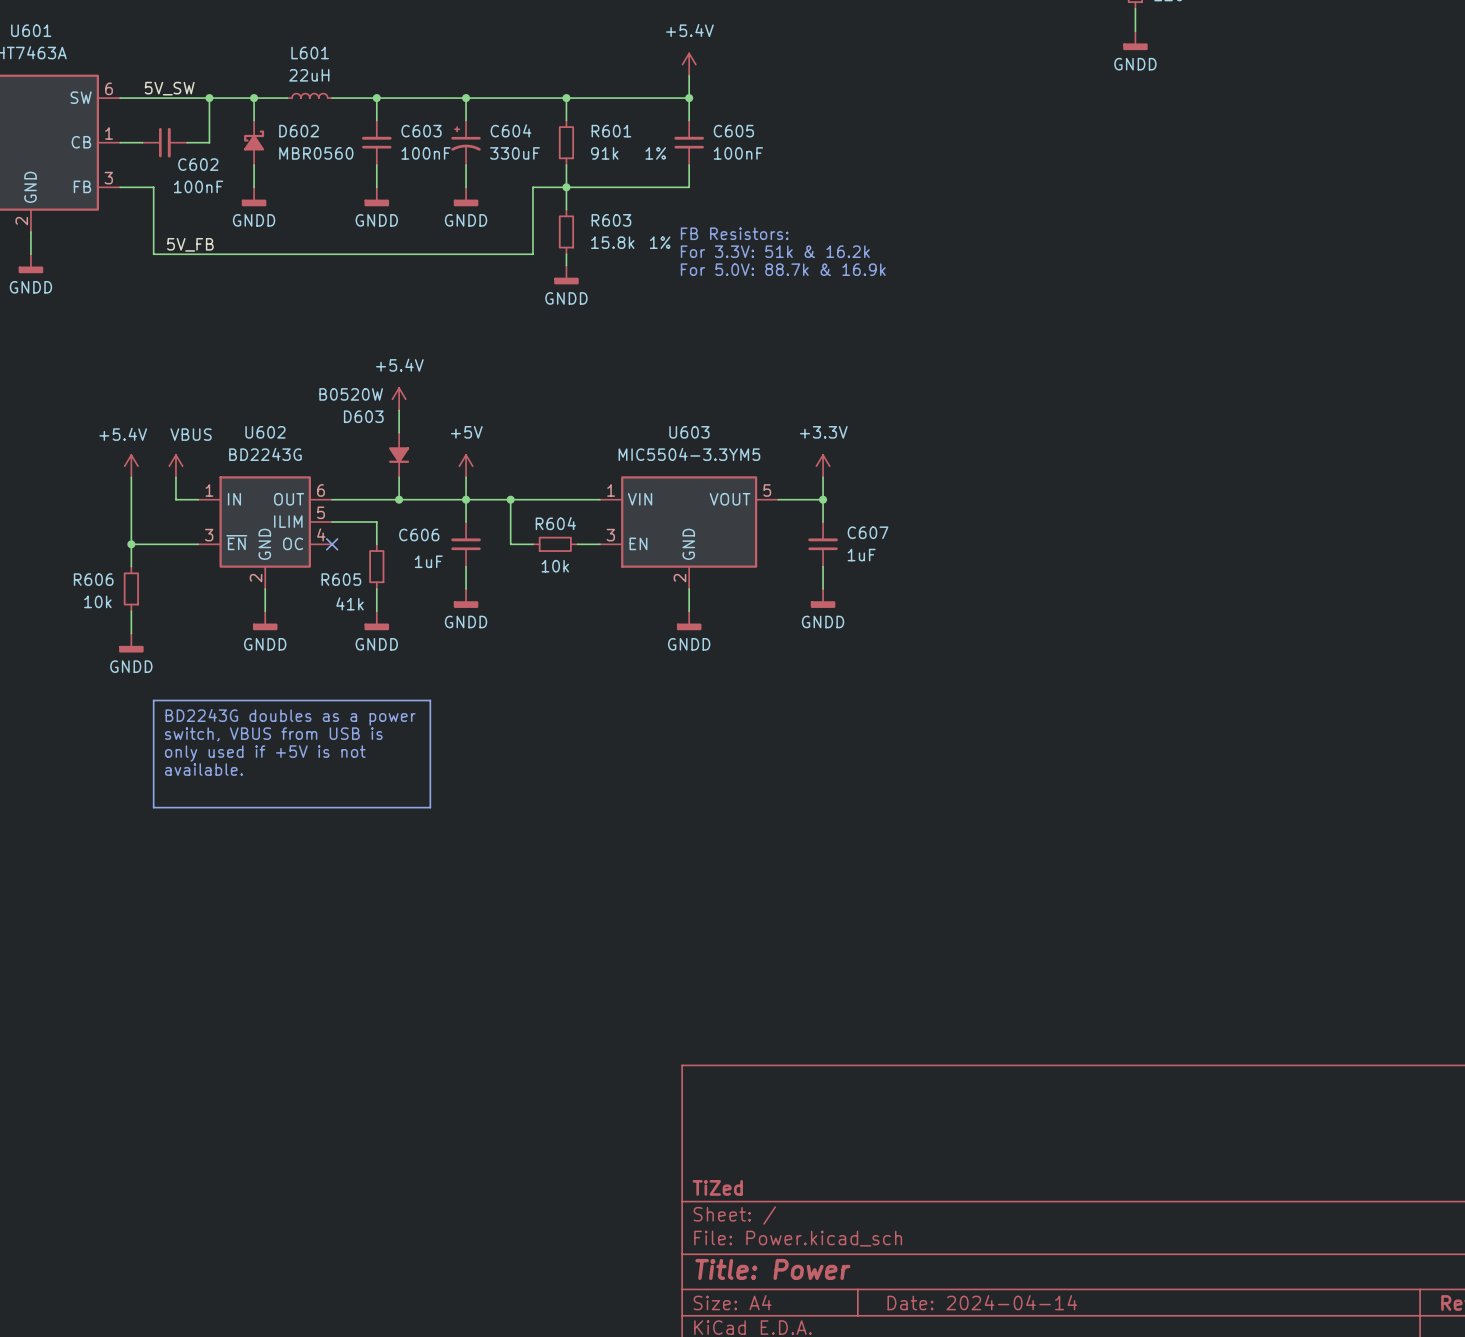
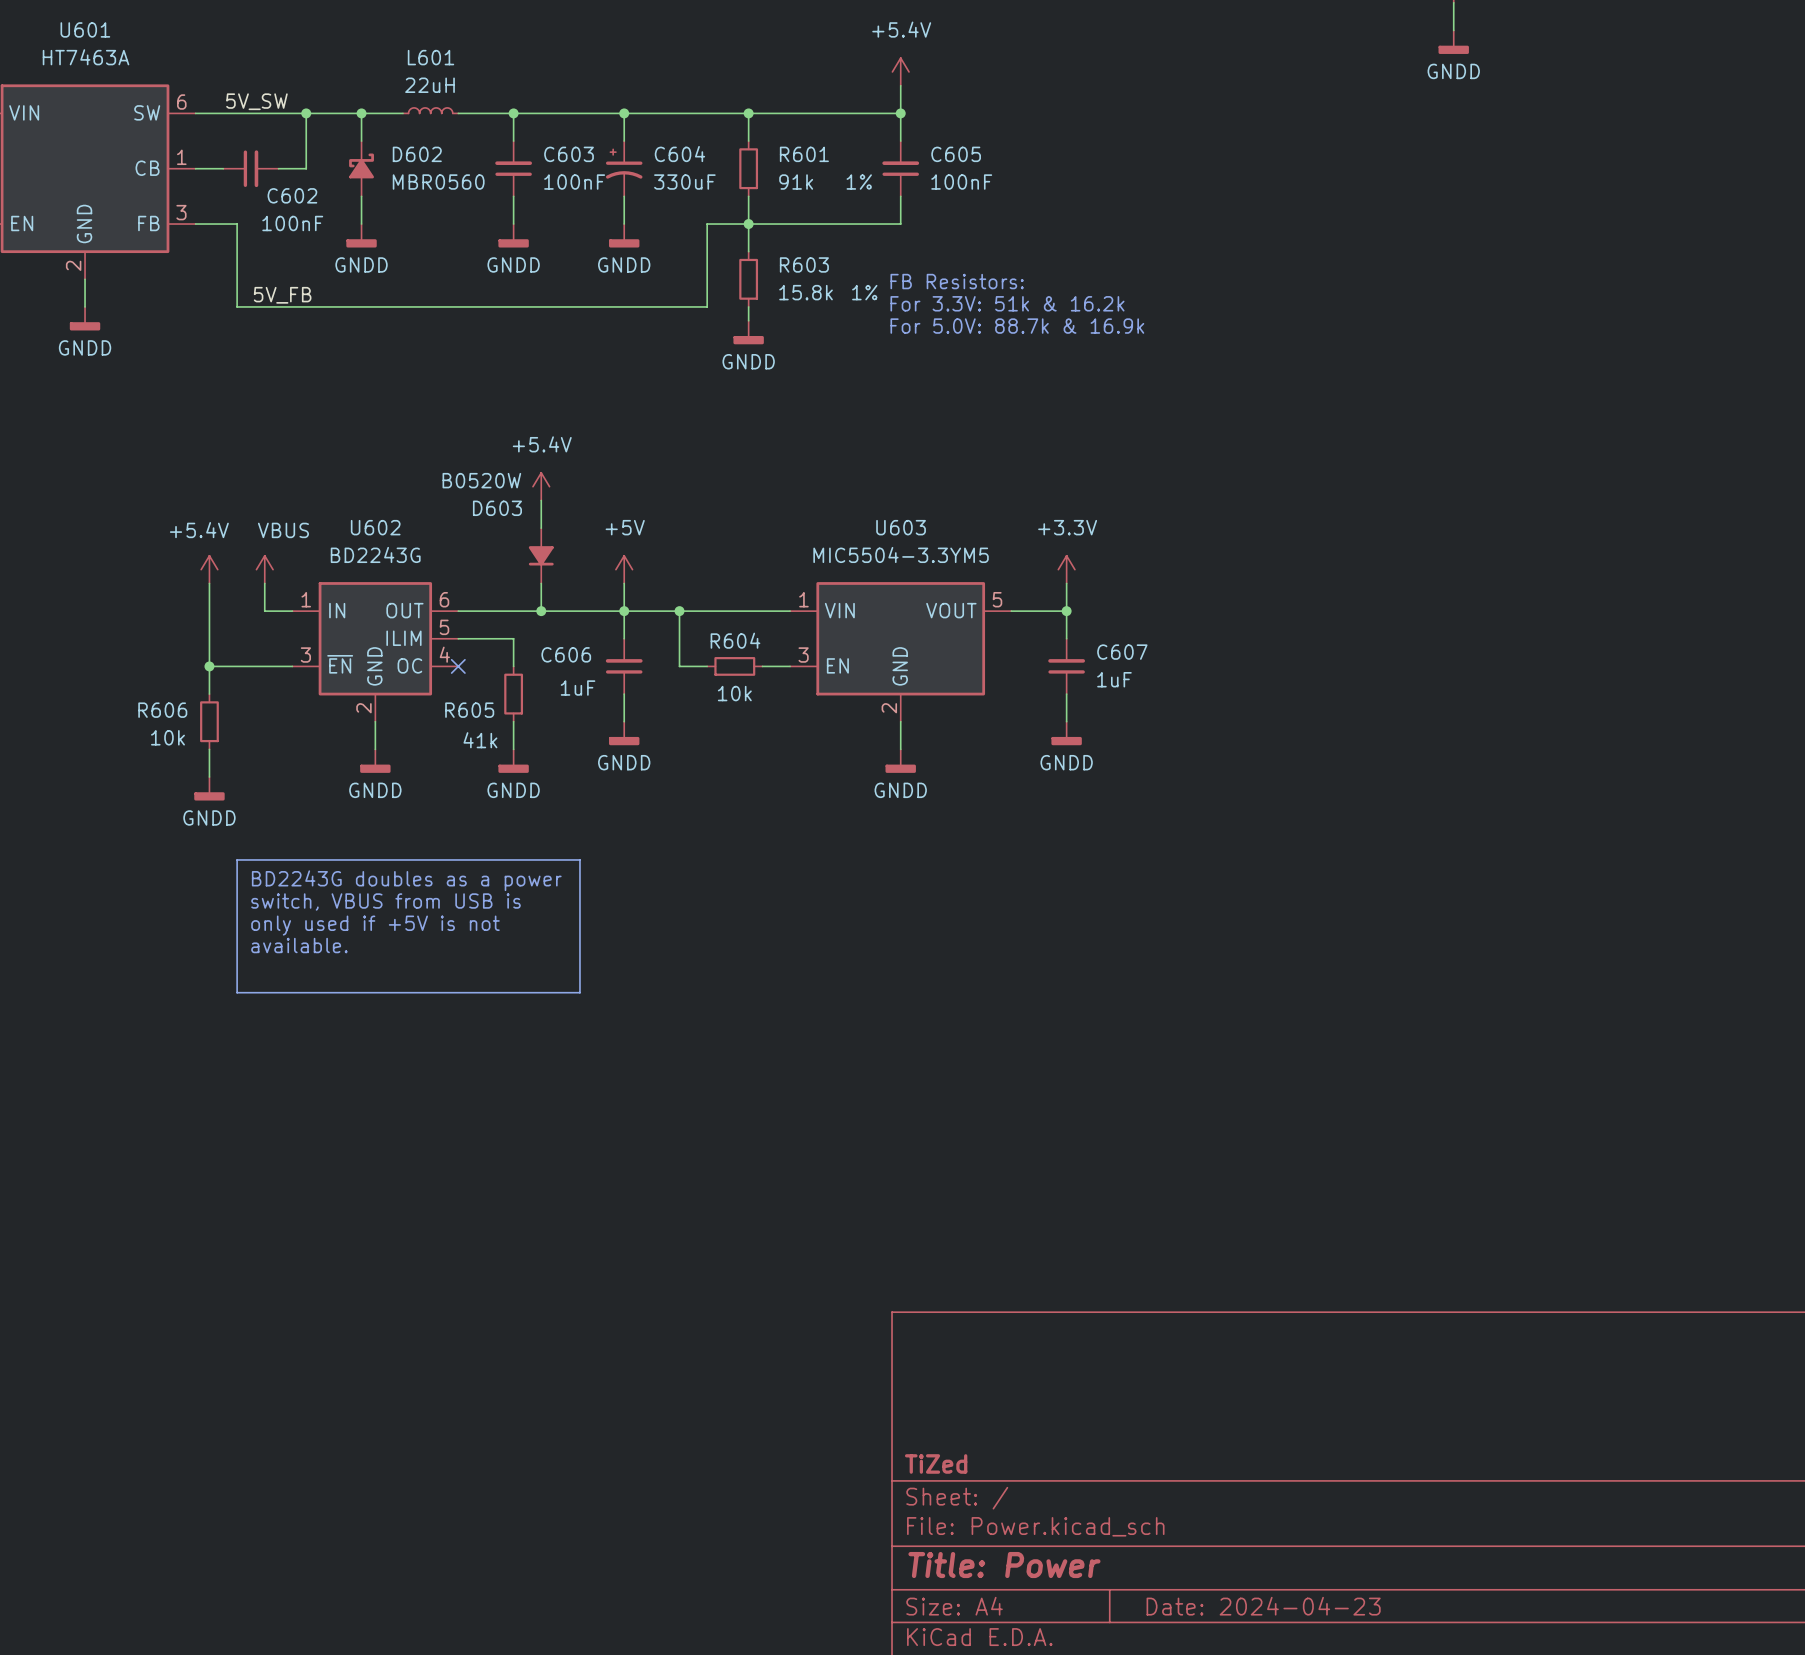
title block: Date: 2024-04-14 (982, 1302) -> Date: 2024-04-23 (1263, 1606)

